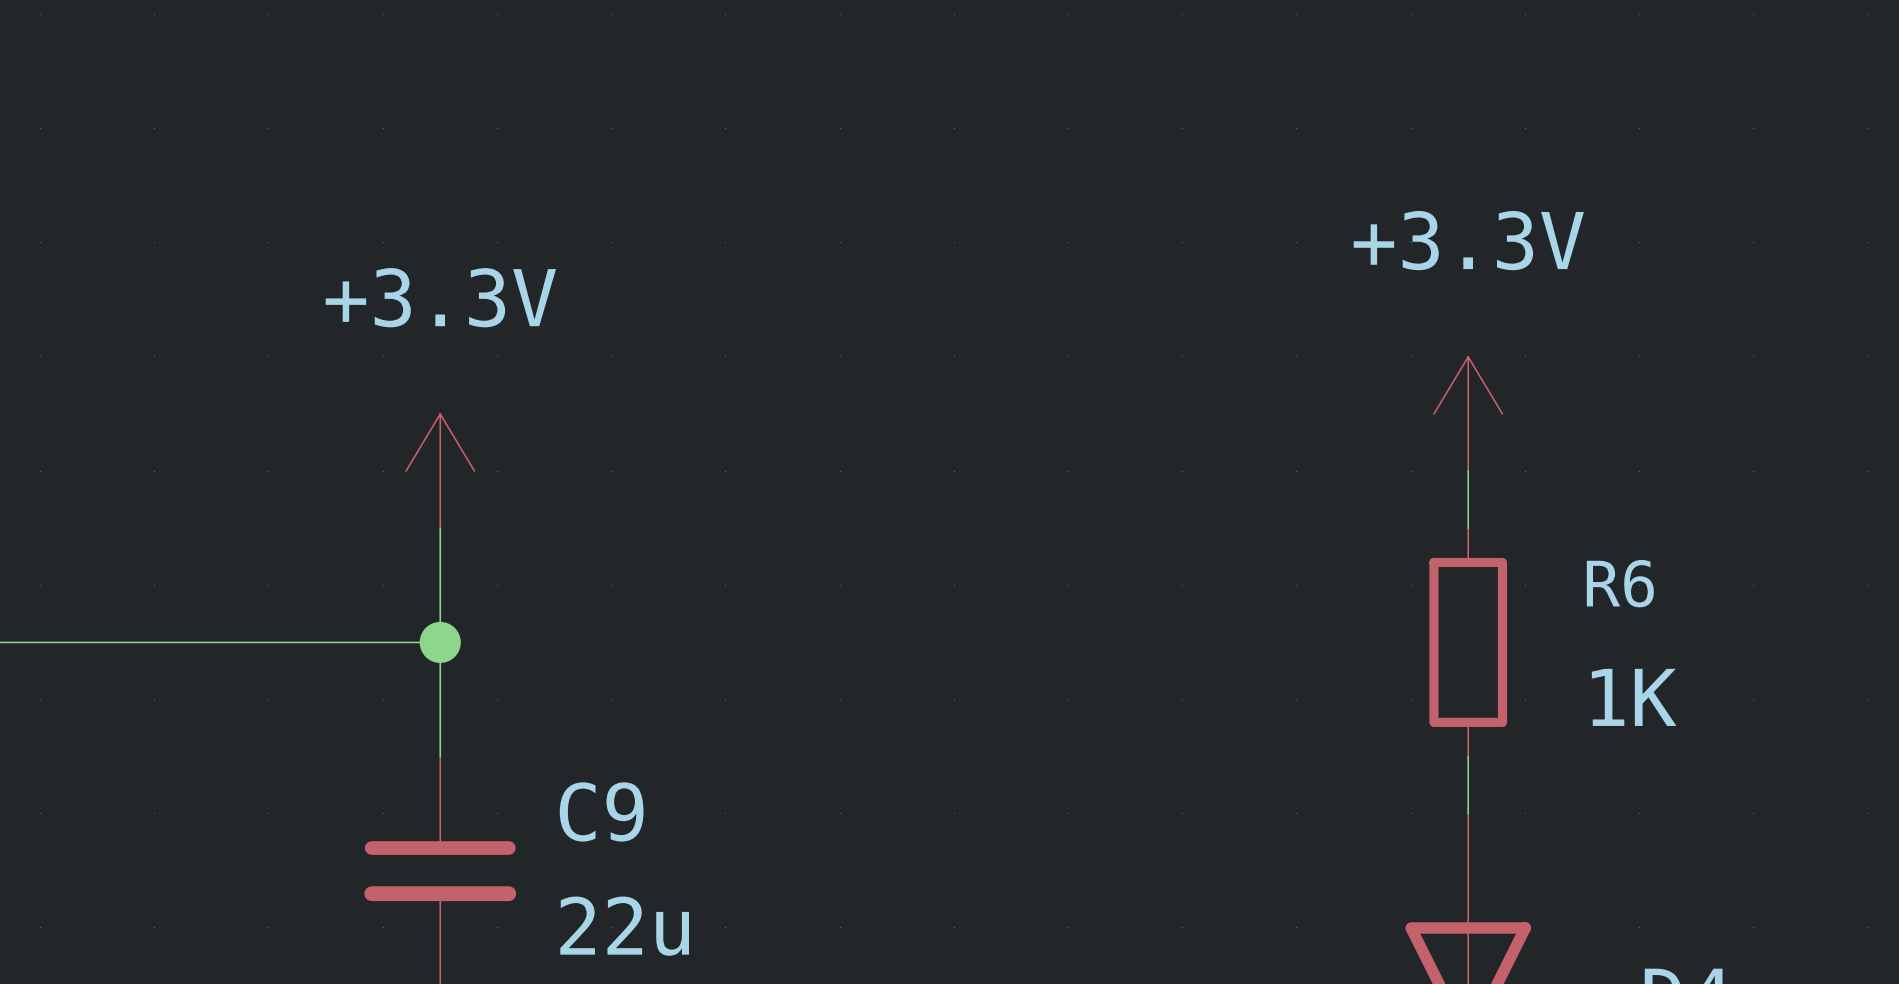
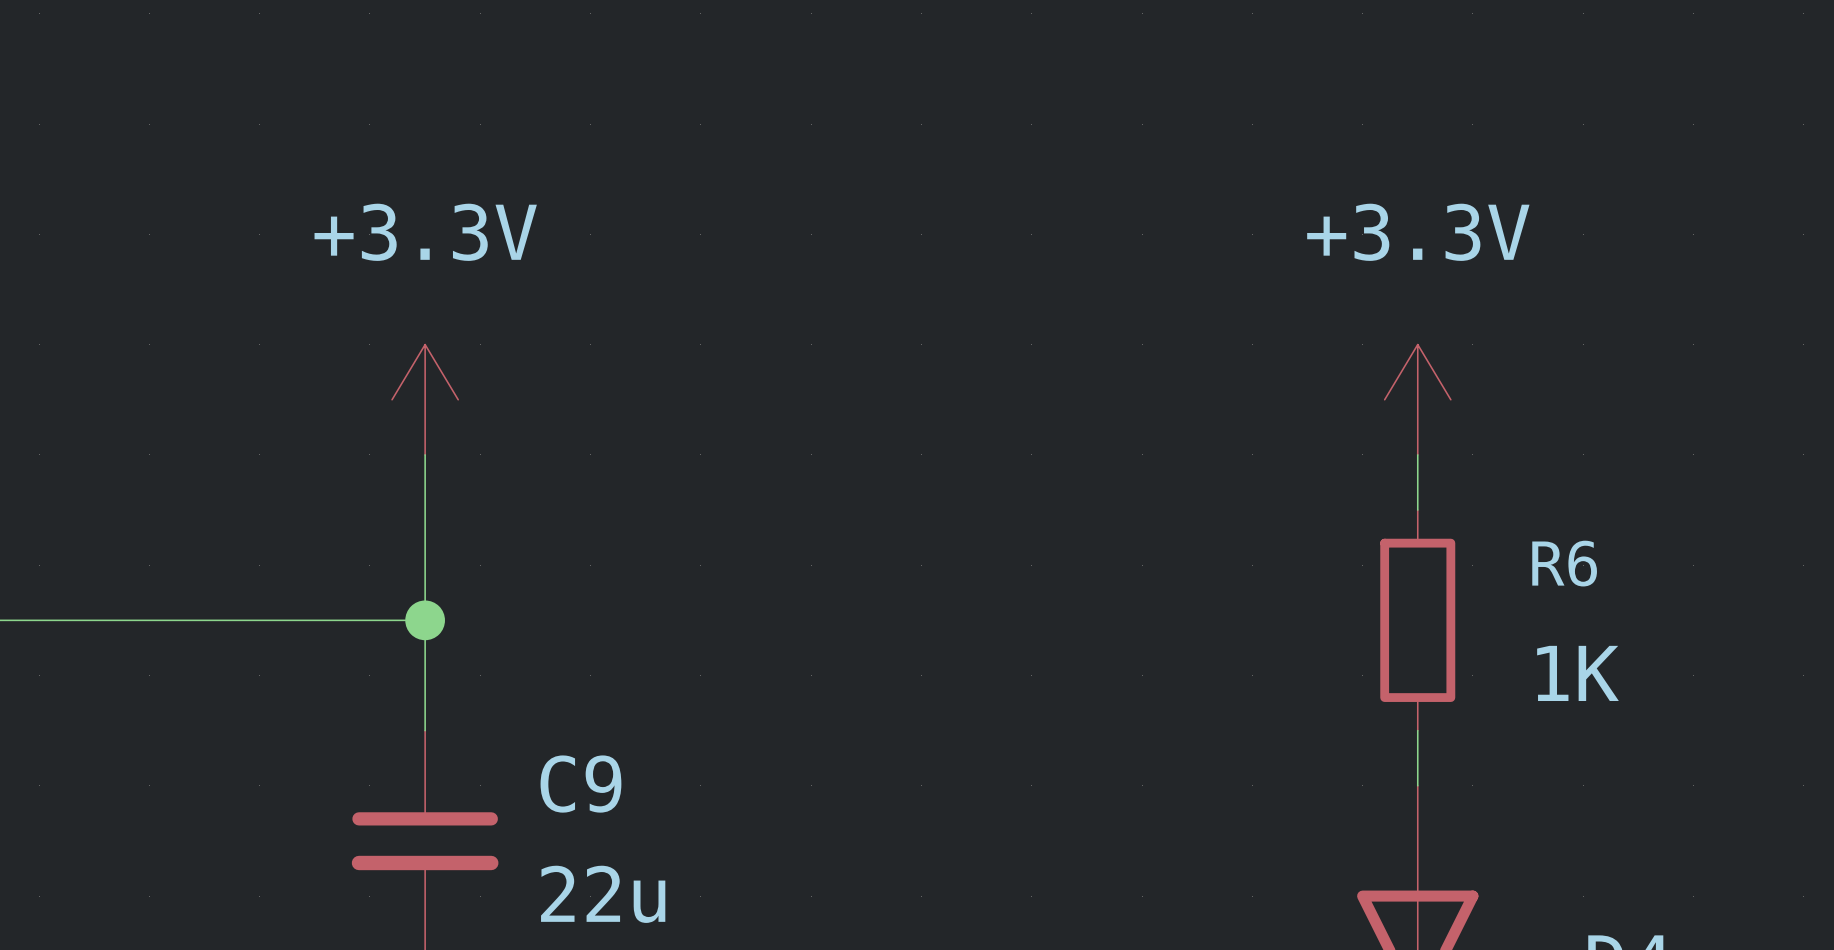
power symbol position: +3.3V (440, 471) -> +3.3V (425, 399)

